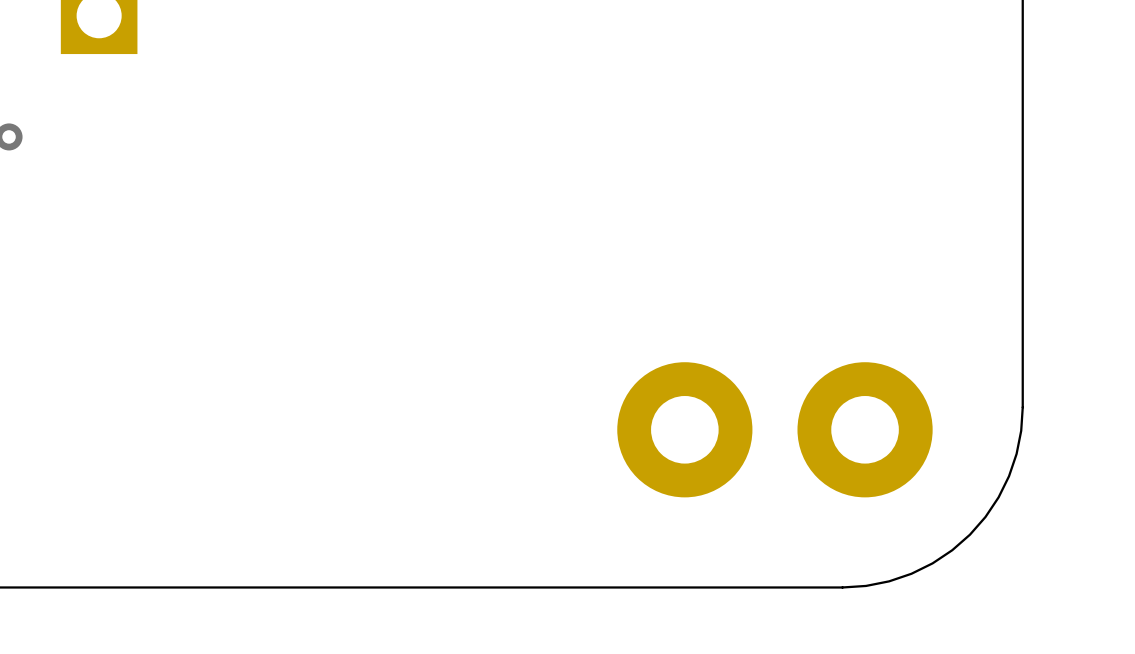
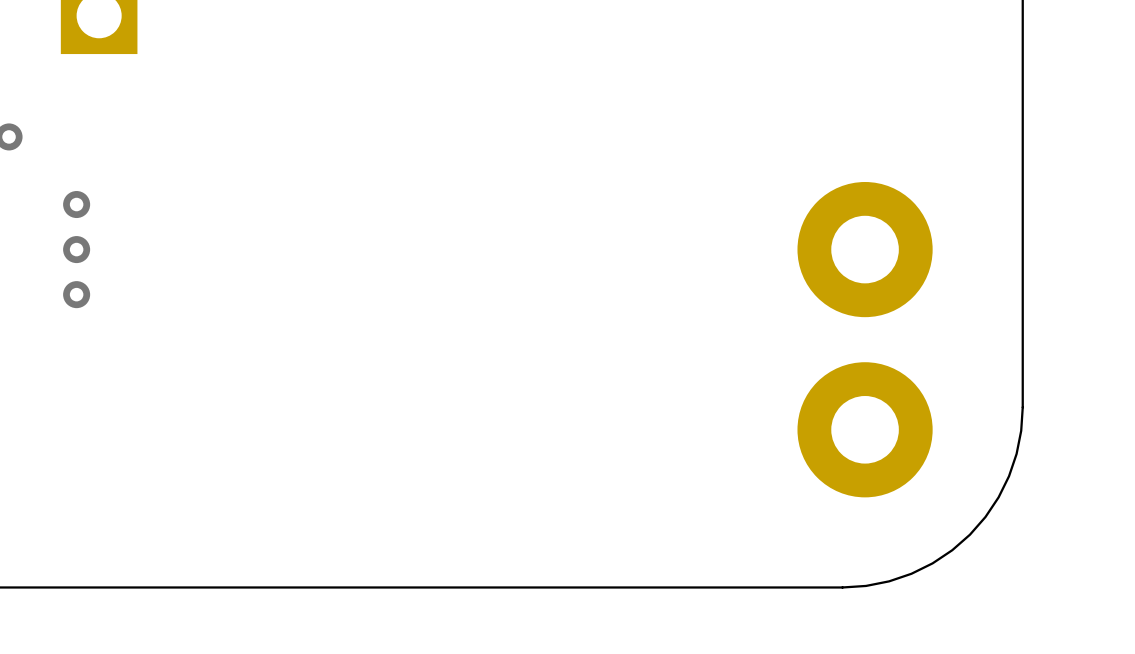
via: none -> (76, 204)
via: none -> (76, 249)
via: none -> (76, 294)
part rotation: 0° (774, 429) -> 90° clockwise (865, 339)

